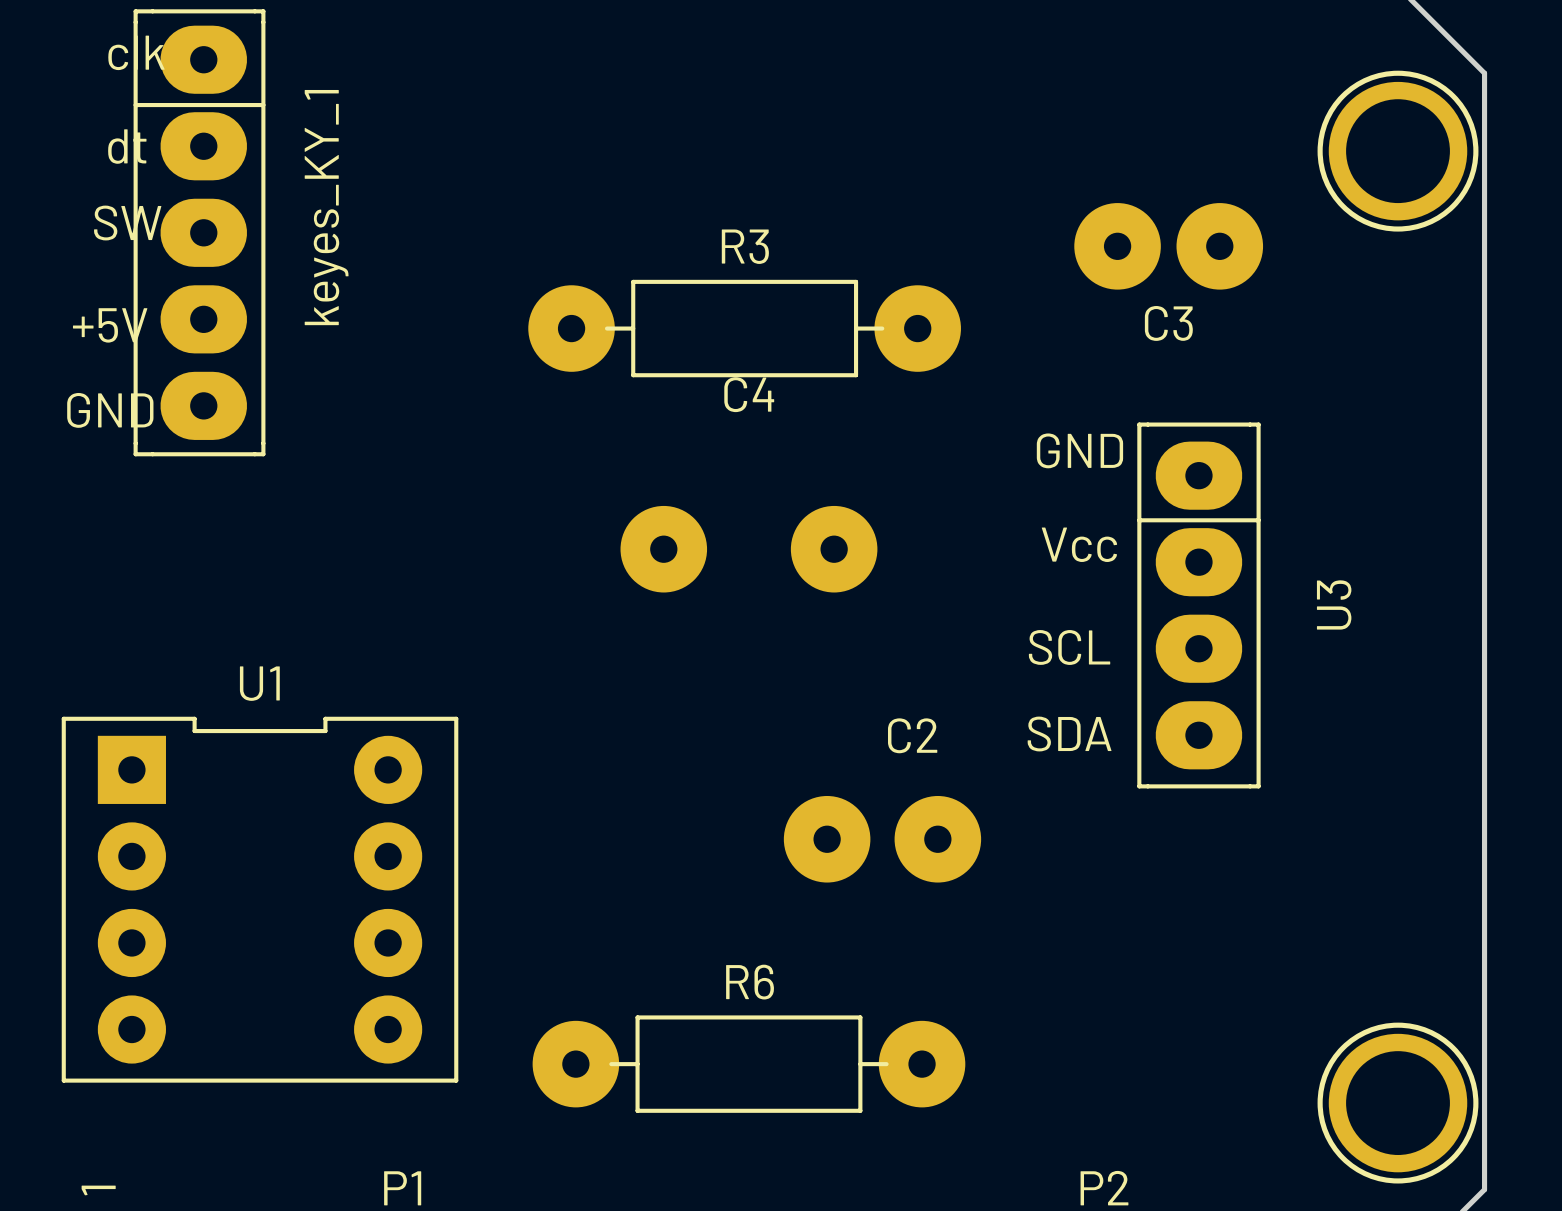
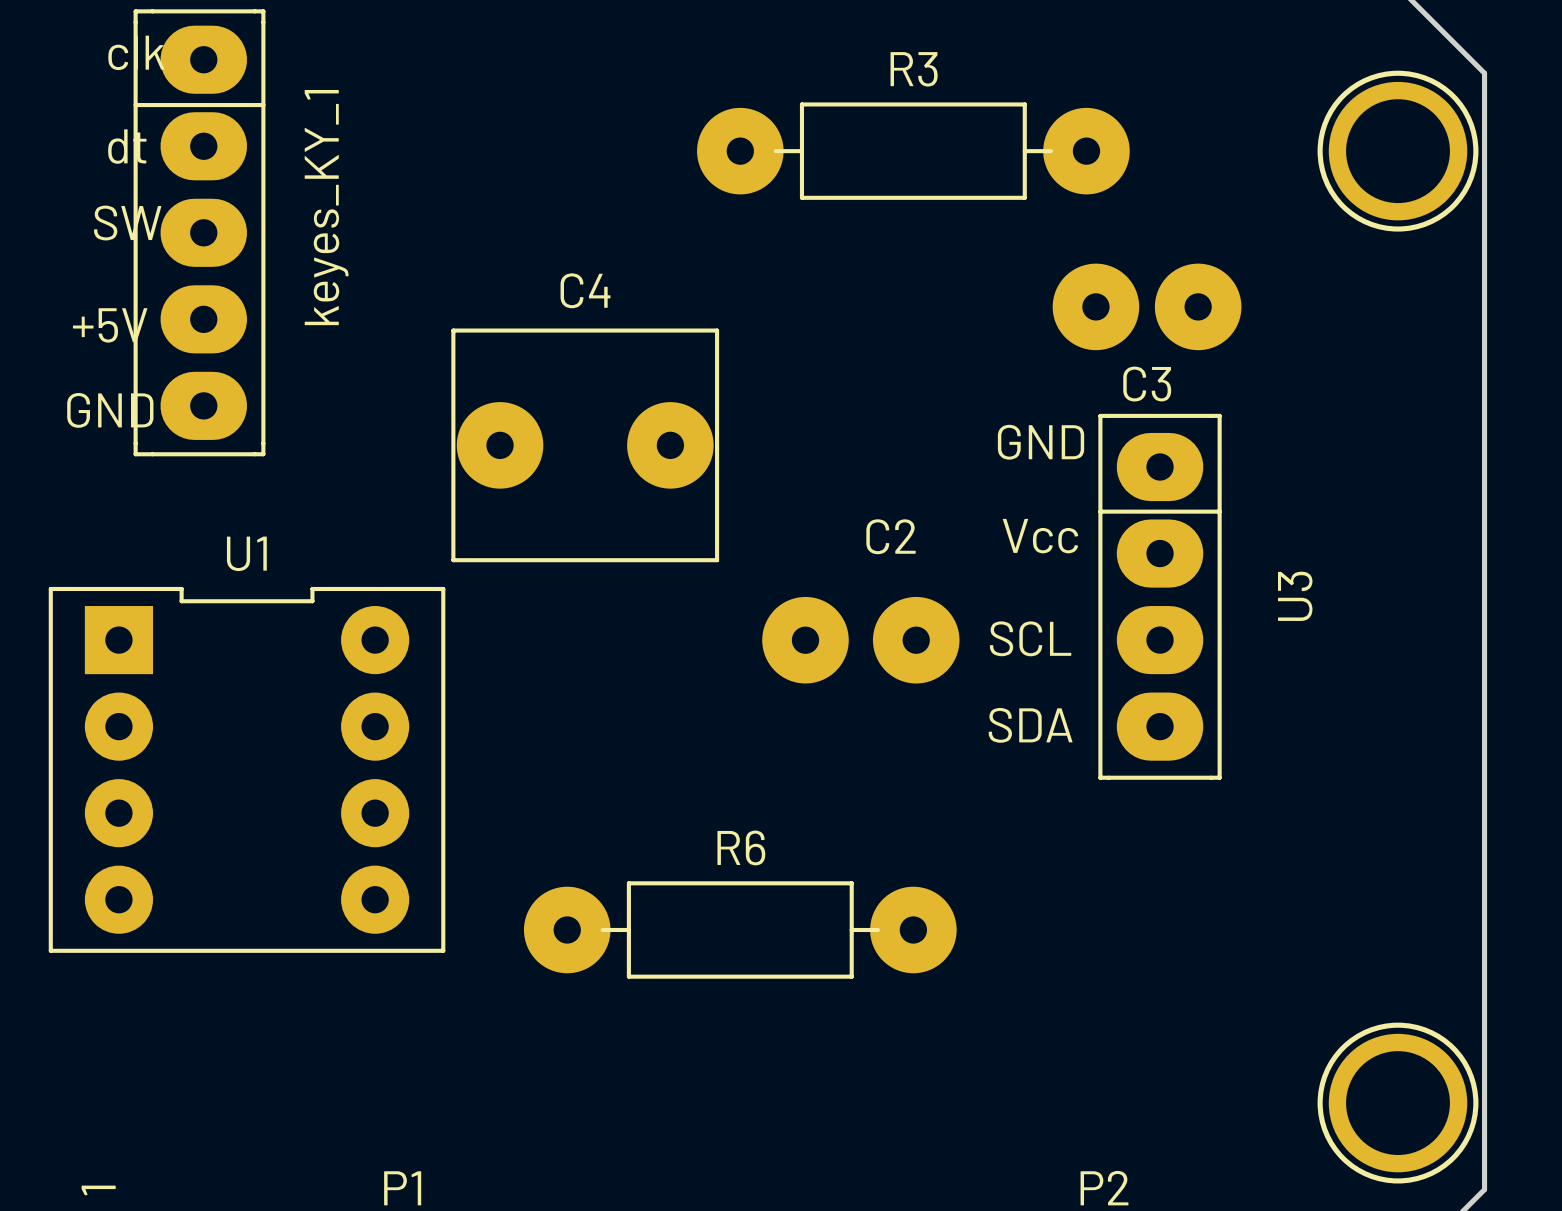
C3 position: (1168, 246) -> (1147, 306)
R3 position: (744, 328) -> (913, 151)
C4 footprint: [620, 505, 878, 593] -> [451, 328, 720, 563]
U3 position: (1198, 605) -> (1160, 596)
C2 position: (882, 839) -> (860, 640)
U1 position: (260, 899) -> (247, 769)
R6 position: (748, 1064) -> (740, 929)

